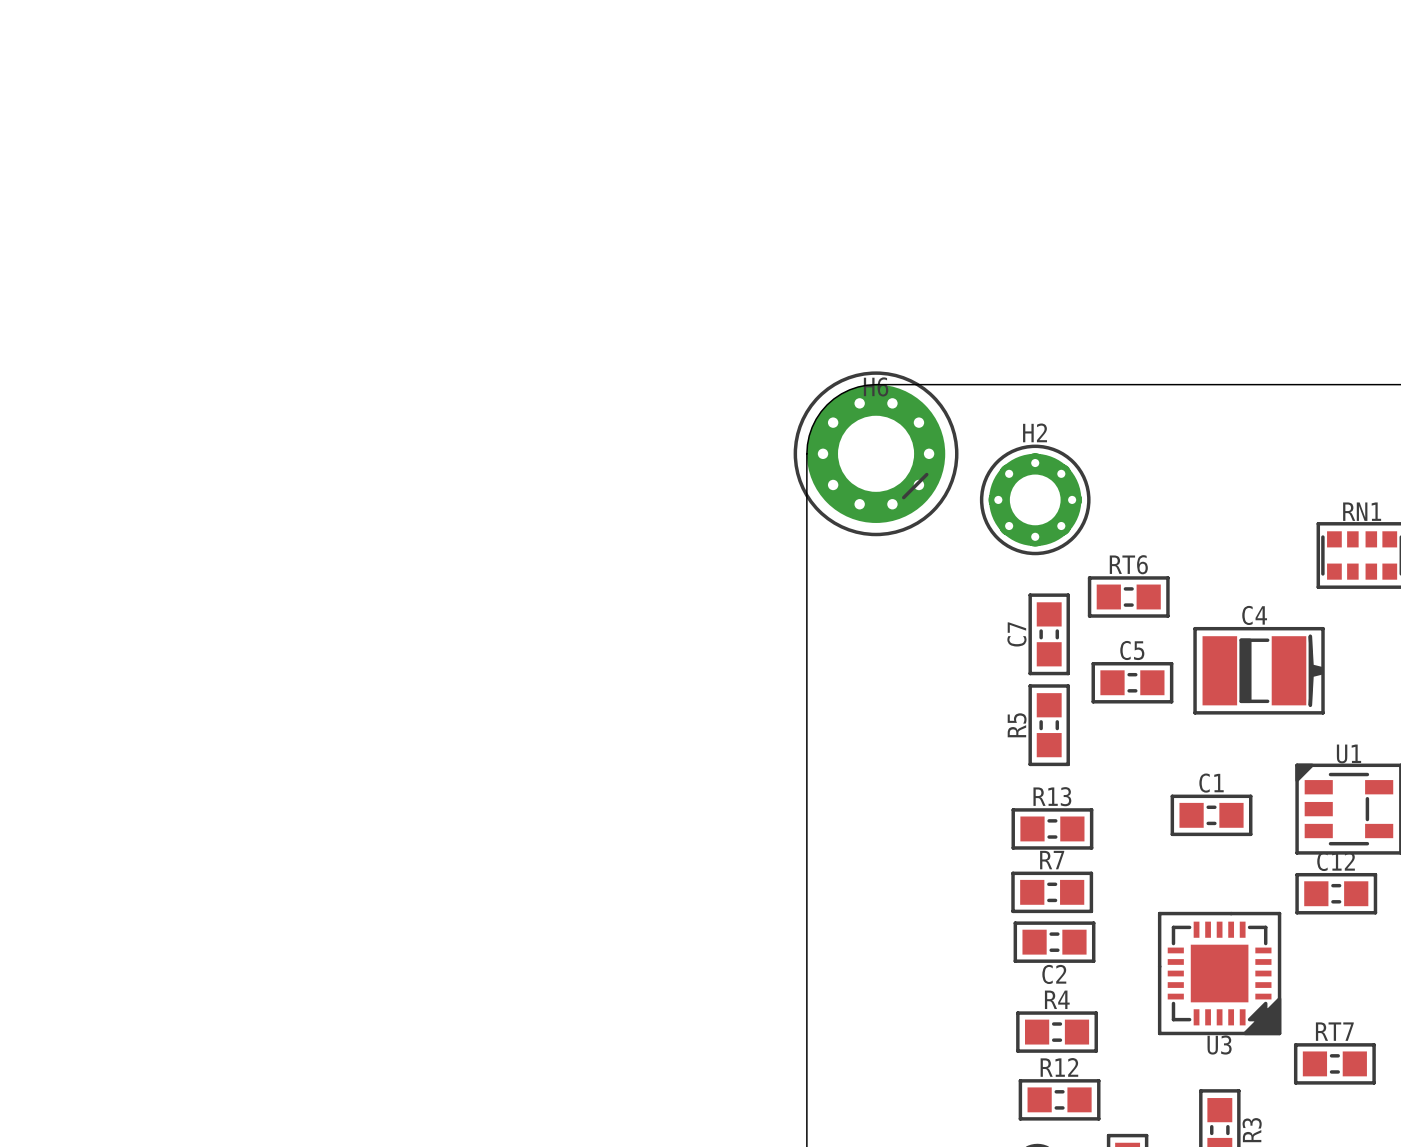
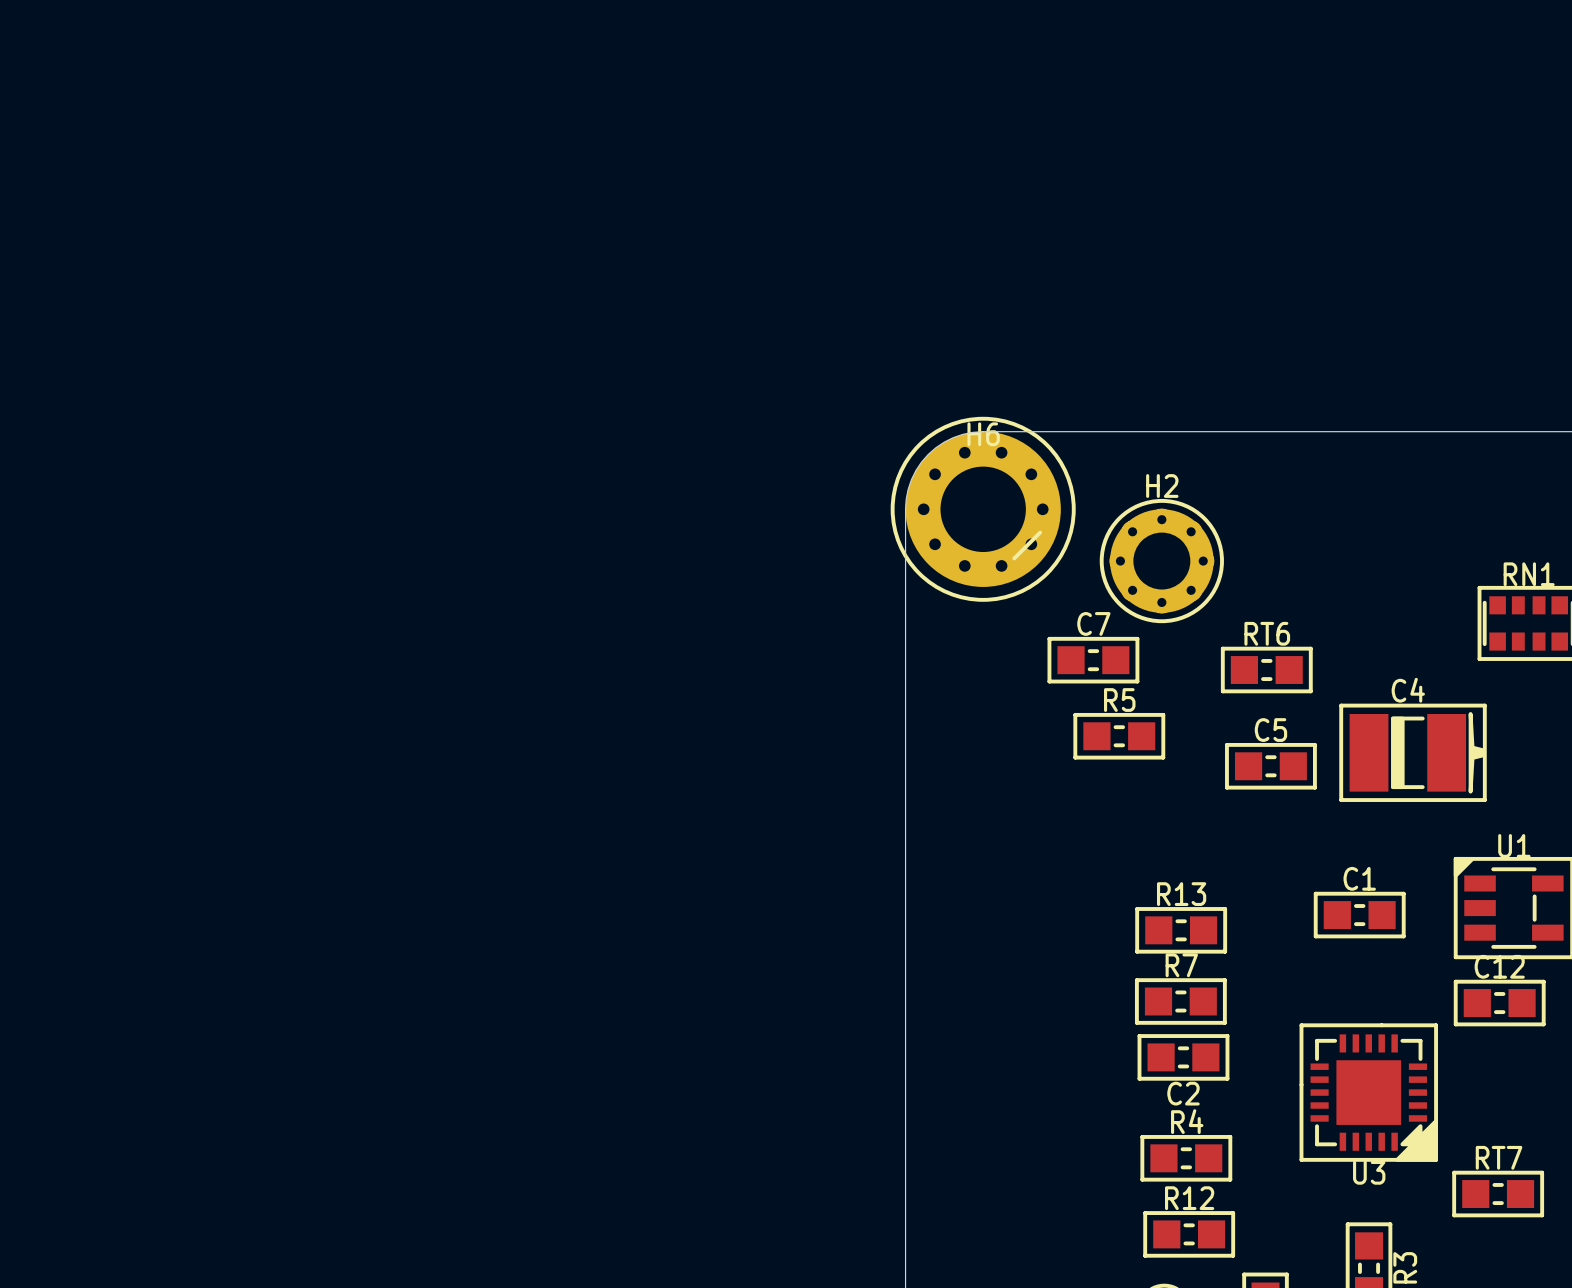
C7 rotation: 0° (1049, 634) -> 90° clockwise (1093, 660)
C7 position: (1049, 634) -> (1093, 660)
R5 rotation: 0° (1049, 725) -> 90° clockwise (1119, 736)
R5 position: (1049, 725) -> (1119, 736)

